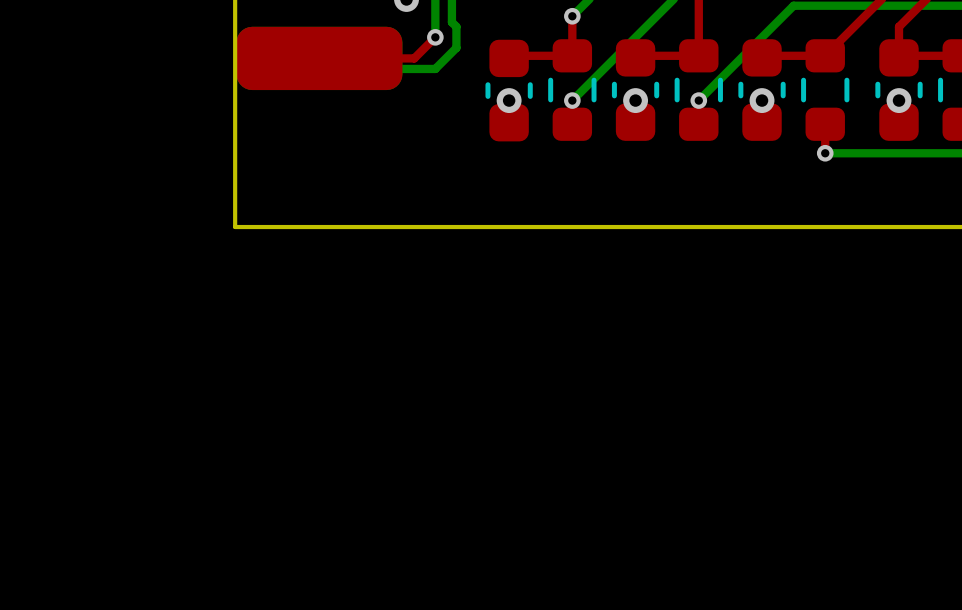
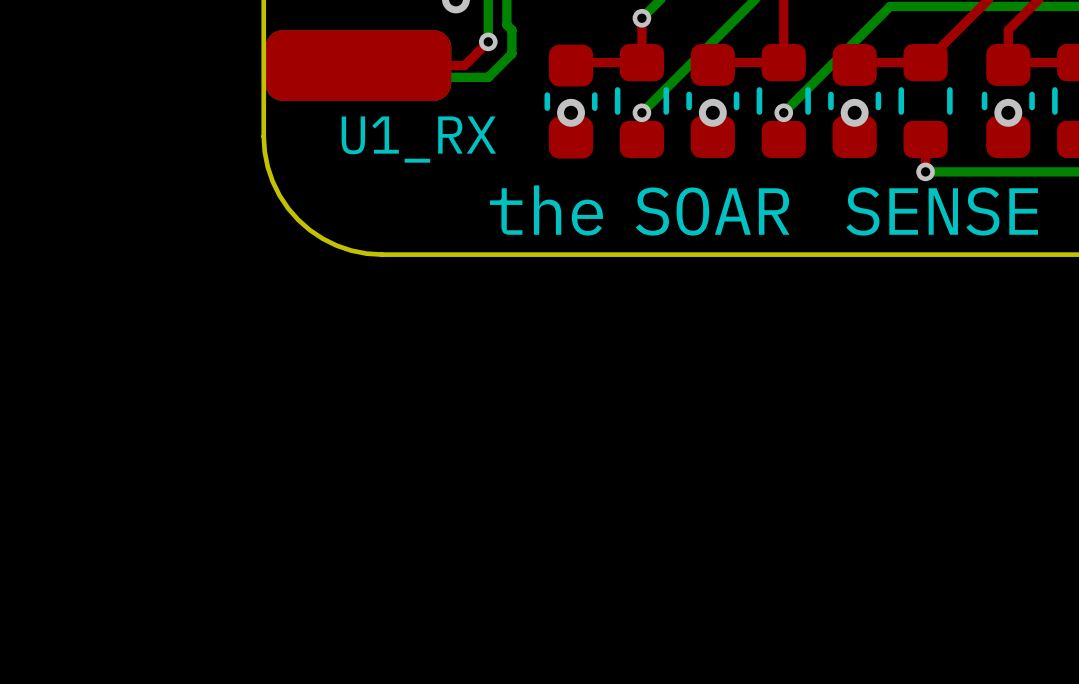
board edge: (235, 121) (235, 227) (340, 227) -> (263, 136) (267, 167) (272, 181) (279, 195) (298, 220) (322, 238) (336, 245) (351, 250) (381, 254)
text: none -> U1_RX (418, 139)
text: none -> the (546, 210)
text: none -> SOAR (712, 211)
text: none -> SENSE (942, 211)

